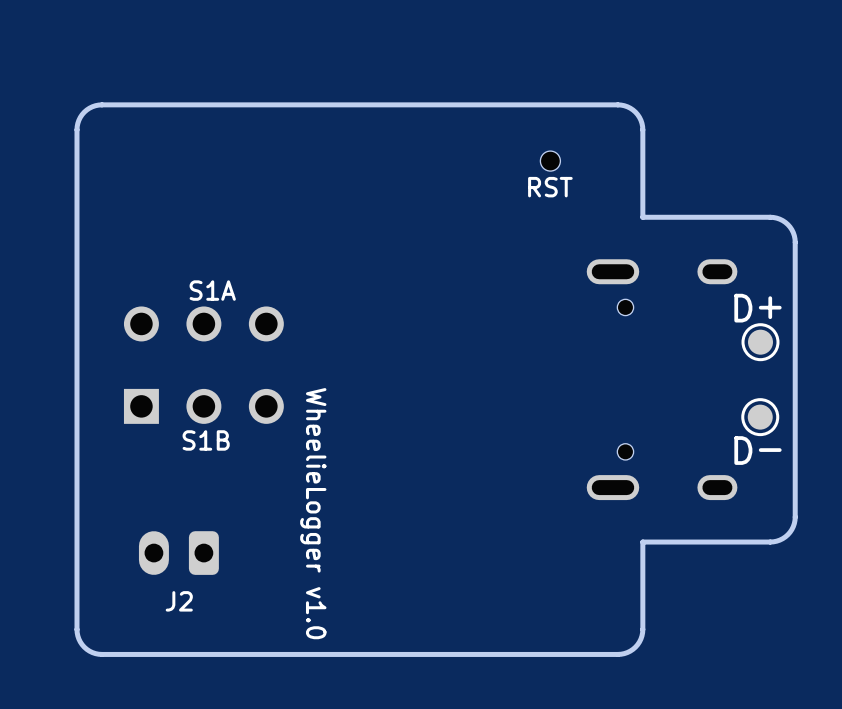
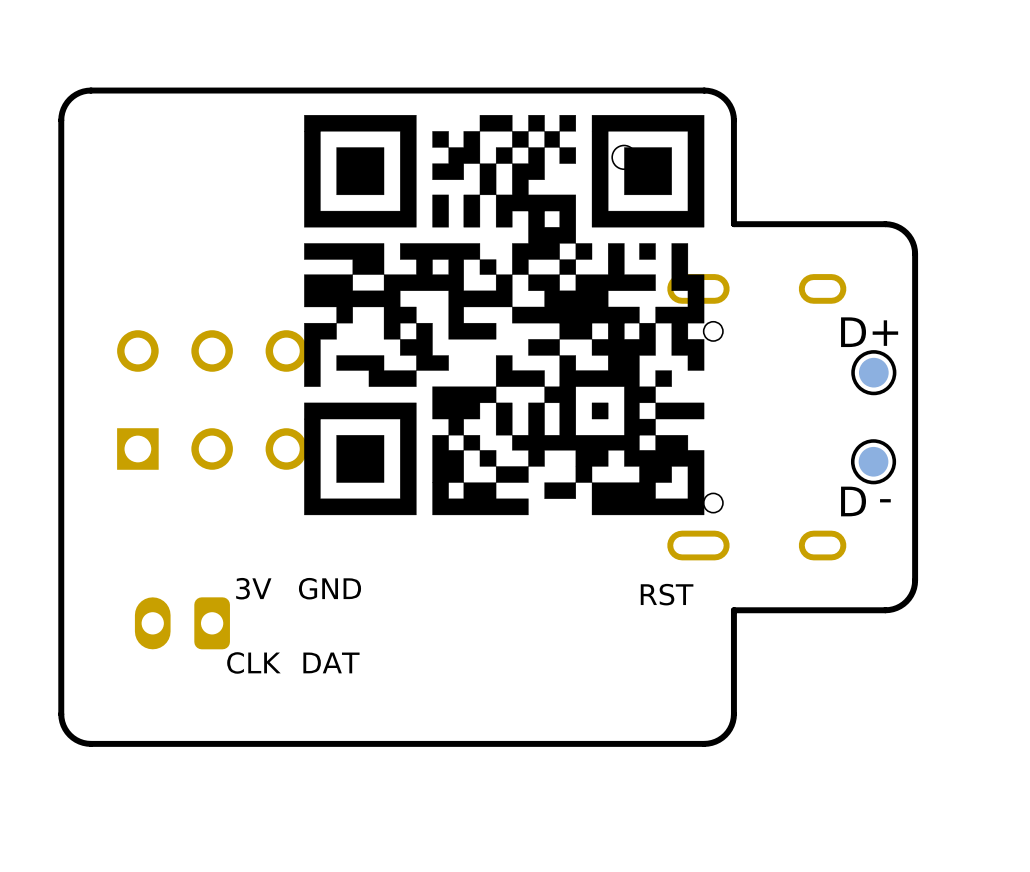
drawing: none -> [304, 115, 705, 516]
text position: RST (550, 187) -> RST (667, 594)
text: S1A (212, 290) -> none
text: S1B (206, 440) -> none
text: WheelieLogger v1.0 (313, 513) -> GND (330, 588)
text: none -> 3V (253, 588)
text: none -> CLK (253, 662)
text: none -> DAT (331, 662)
text: J2 (179, 601) -> none

